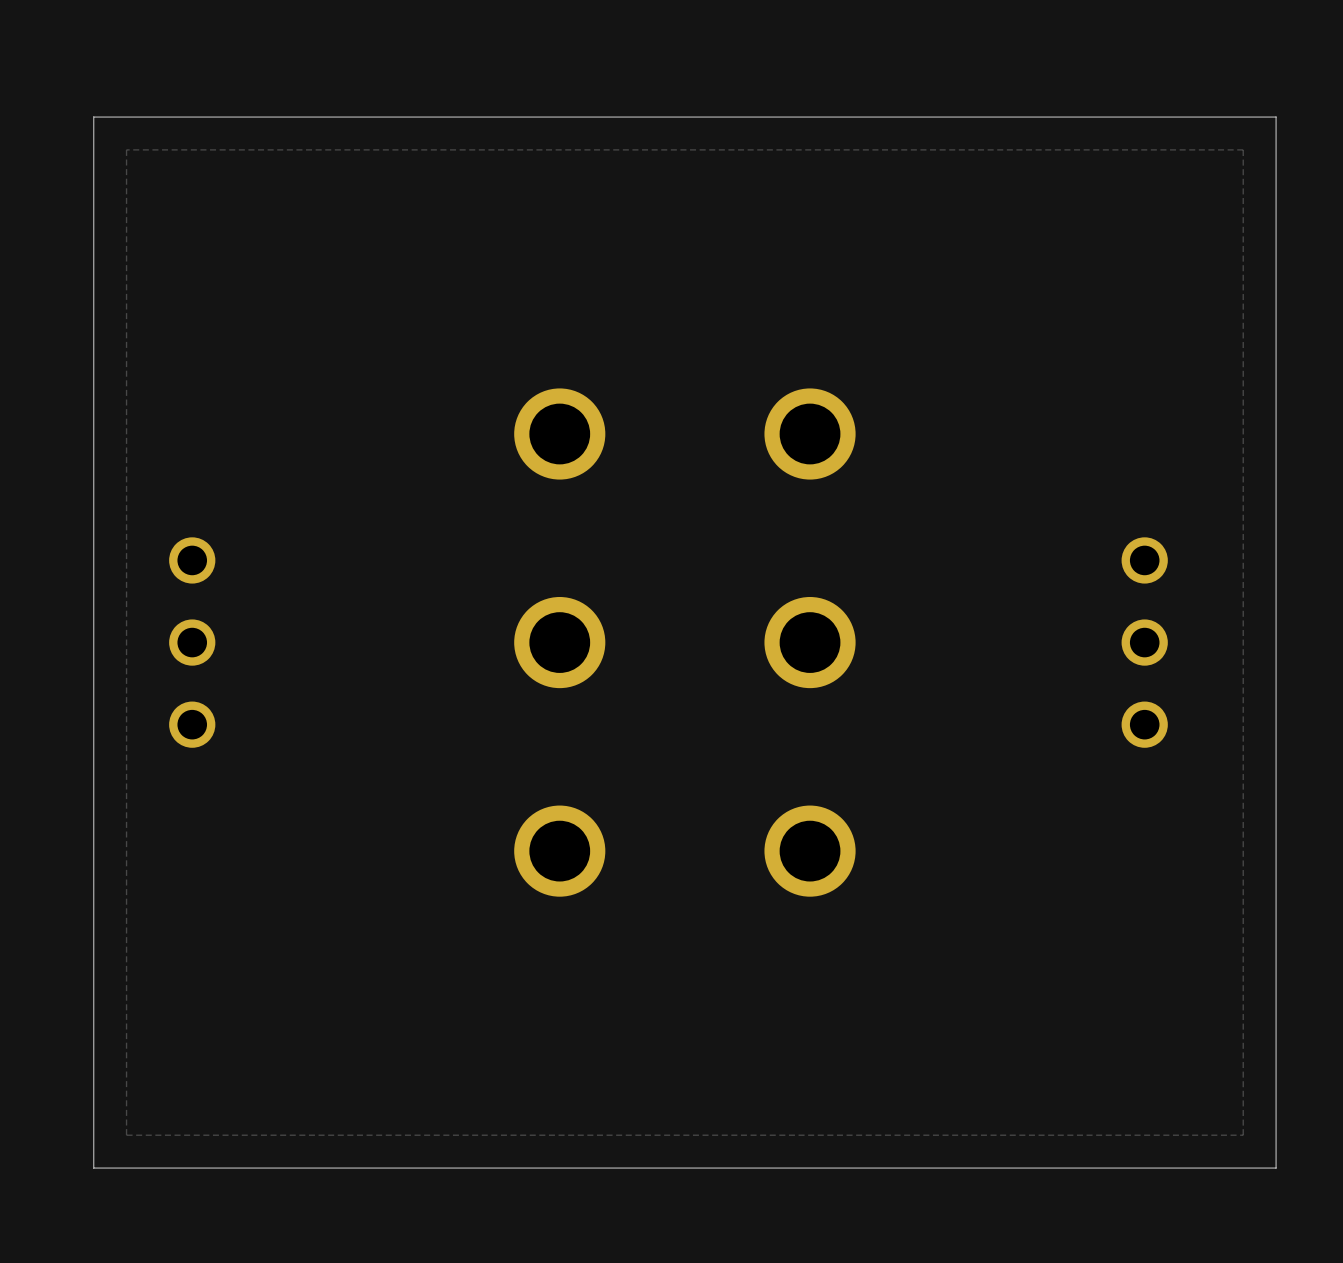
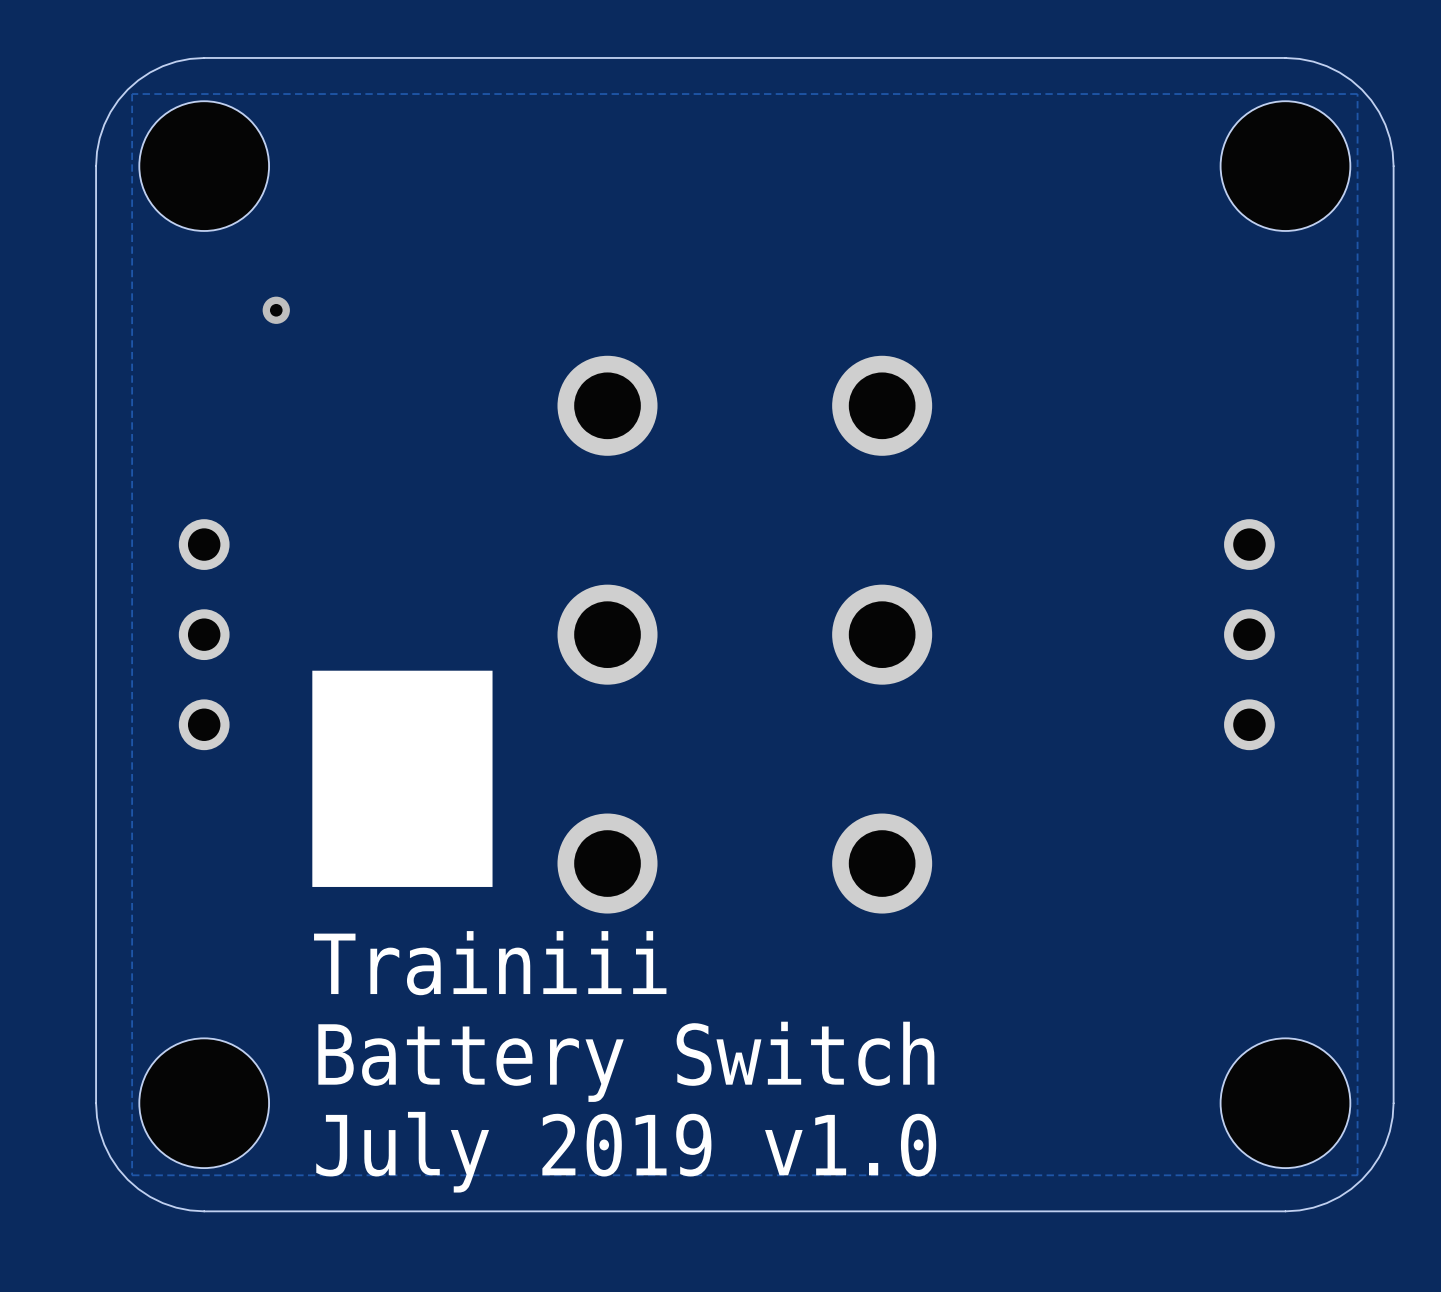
board edge: (192, 117) (93, 117) (93, 215) -> (204, 57) (176, 61) (162, 66) (138, 80) (127, 89) (118, 100) (104, 124) (99, 138) (96, 166)
board edge: (1177, 117) (1276, 117) (1276, 215) -> (1285, 57) (1313, 61) (1326, 66) (1351, 80) (1361, 89) (1371, 100) (1385, 124) (1389, 138) (1393, 166)
hole: none -> (204, 166)
hole: none -> (1285, 166)
via: none -> (276, 310)
drawing: none -> [312, 670, 493, 887]
text: none -> Trainiii (490, 963)
text: none -> Battery Switch (626, 1061)
board edge: (93, 1069) (93, 1168) (192, 1168) -> (96, 1103) (99, 1131) (104, 1144) (118, 1169) (127, 1179) (138, 1189) (162, 1203) (176, 1207) (204, 1211)
hole: none -> (204, 1103)
hole: none -> (1285, 1103)
board edge: (1276, 1069) (1276, 1168) (1177, 1168) -> (1393, 1103) (1389, 1131) (1385, 1144) (1371, 1169) (1361, 1179) (1351, 1189) (1326, 1203) (1313, 1207) (1285, 1211)
text: none -> July 2019 v1.0 (626, 1152)

